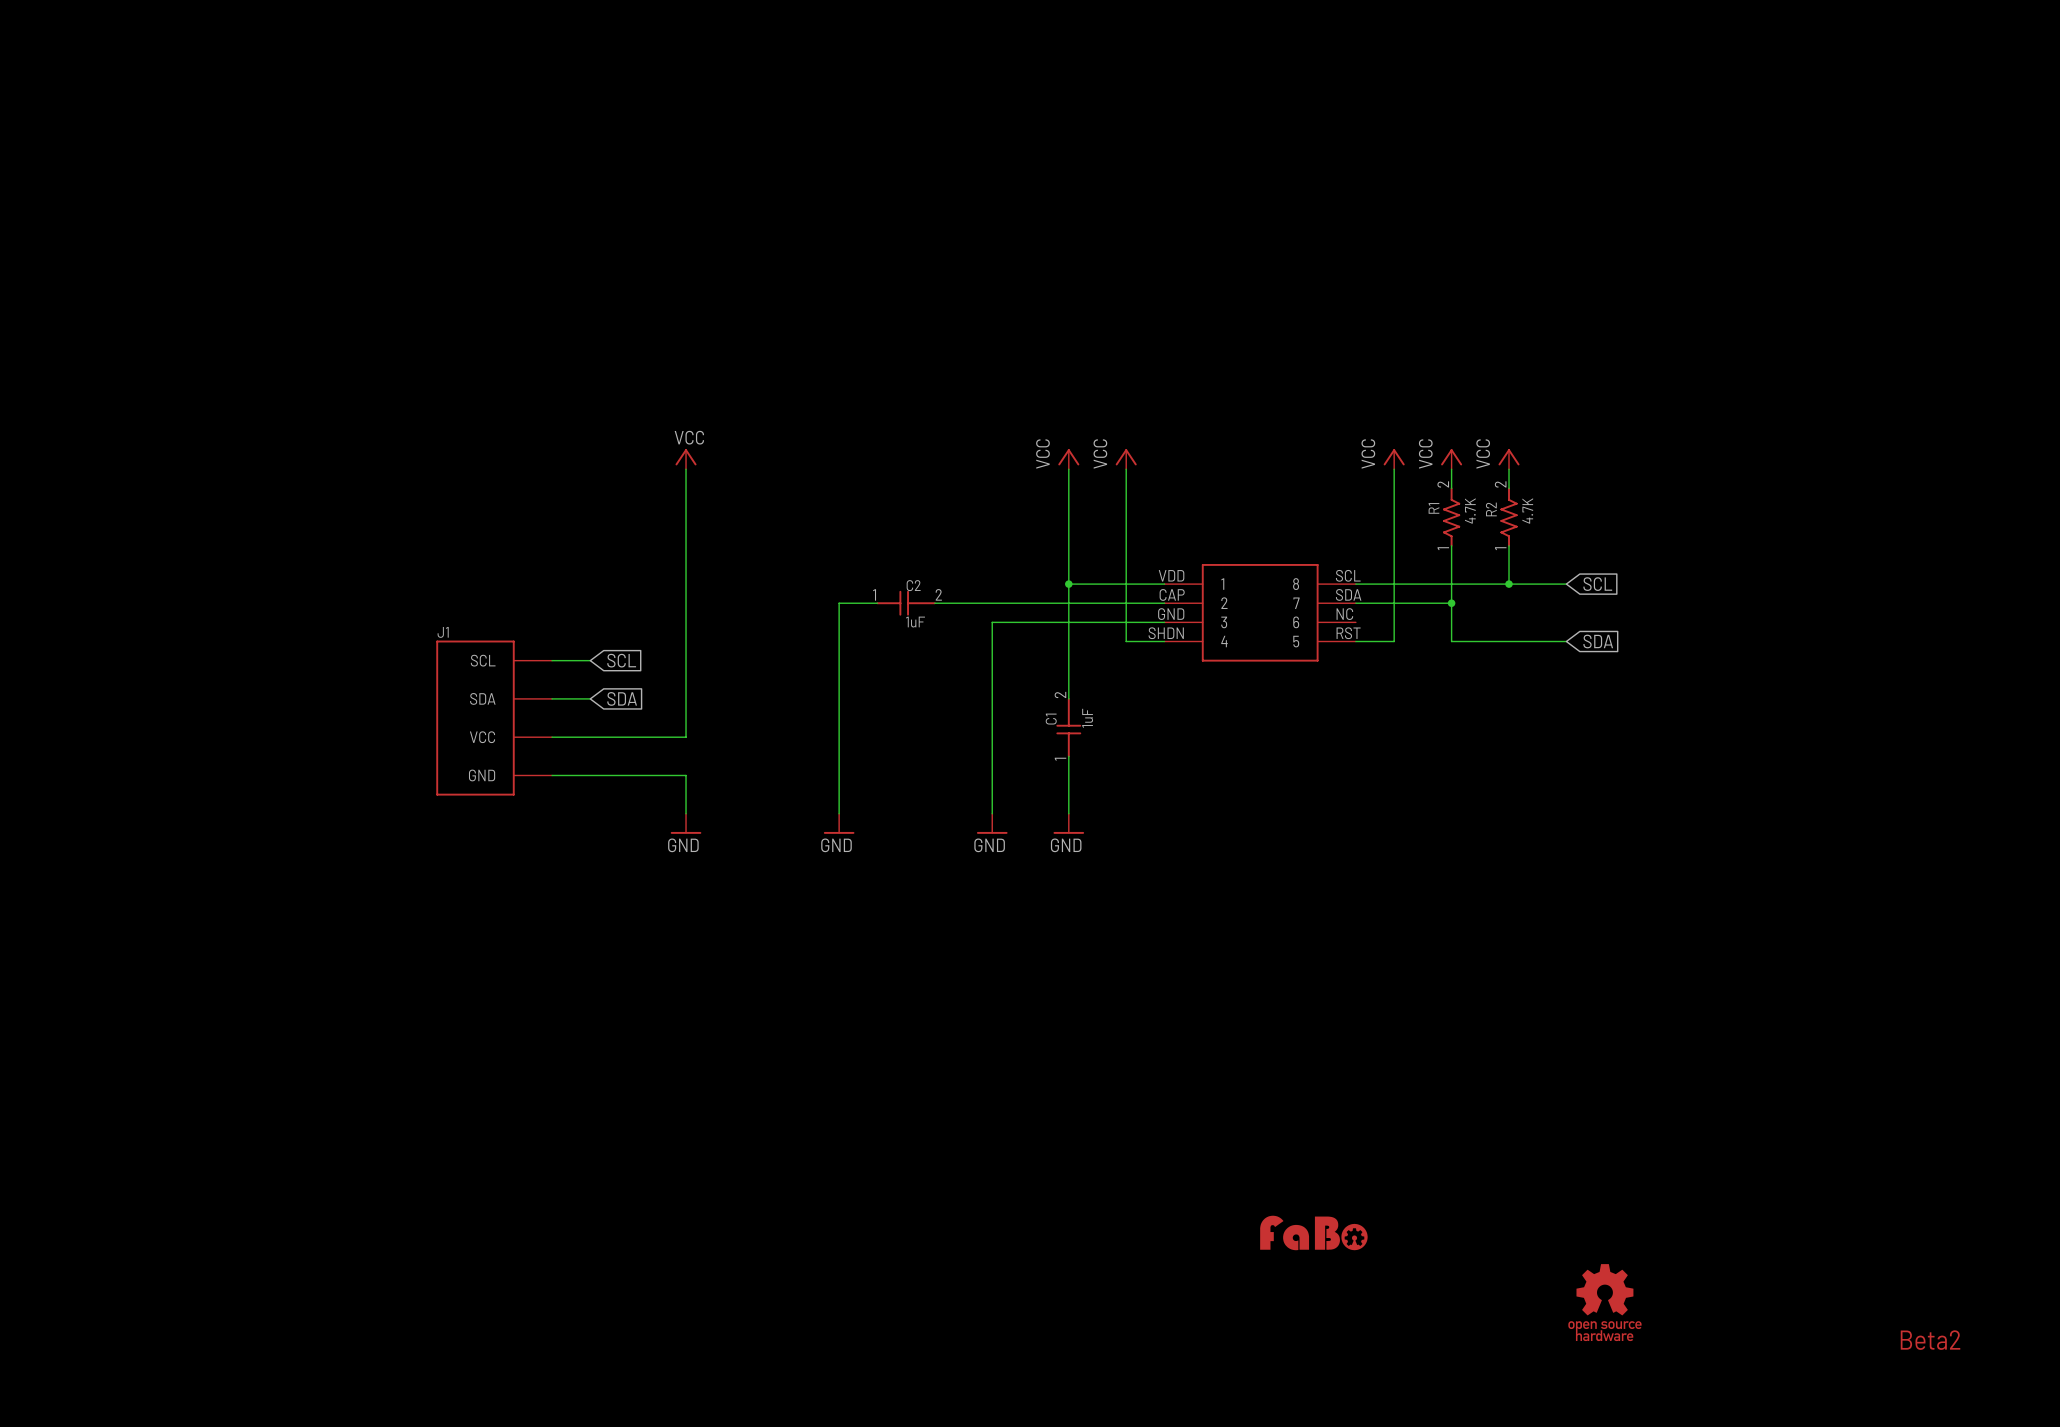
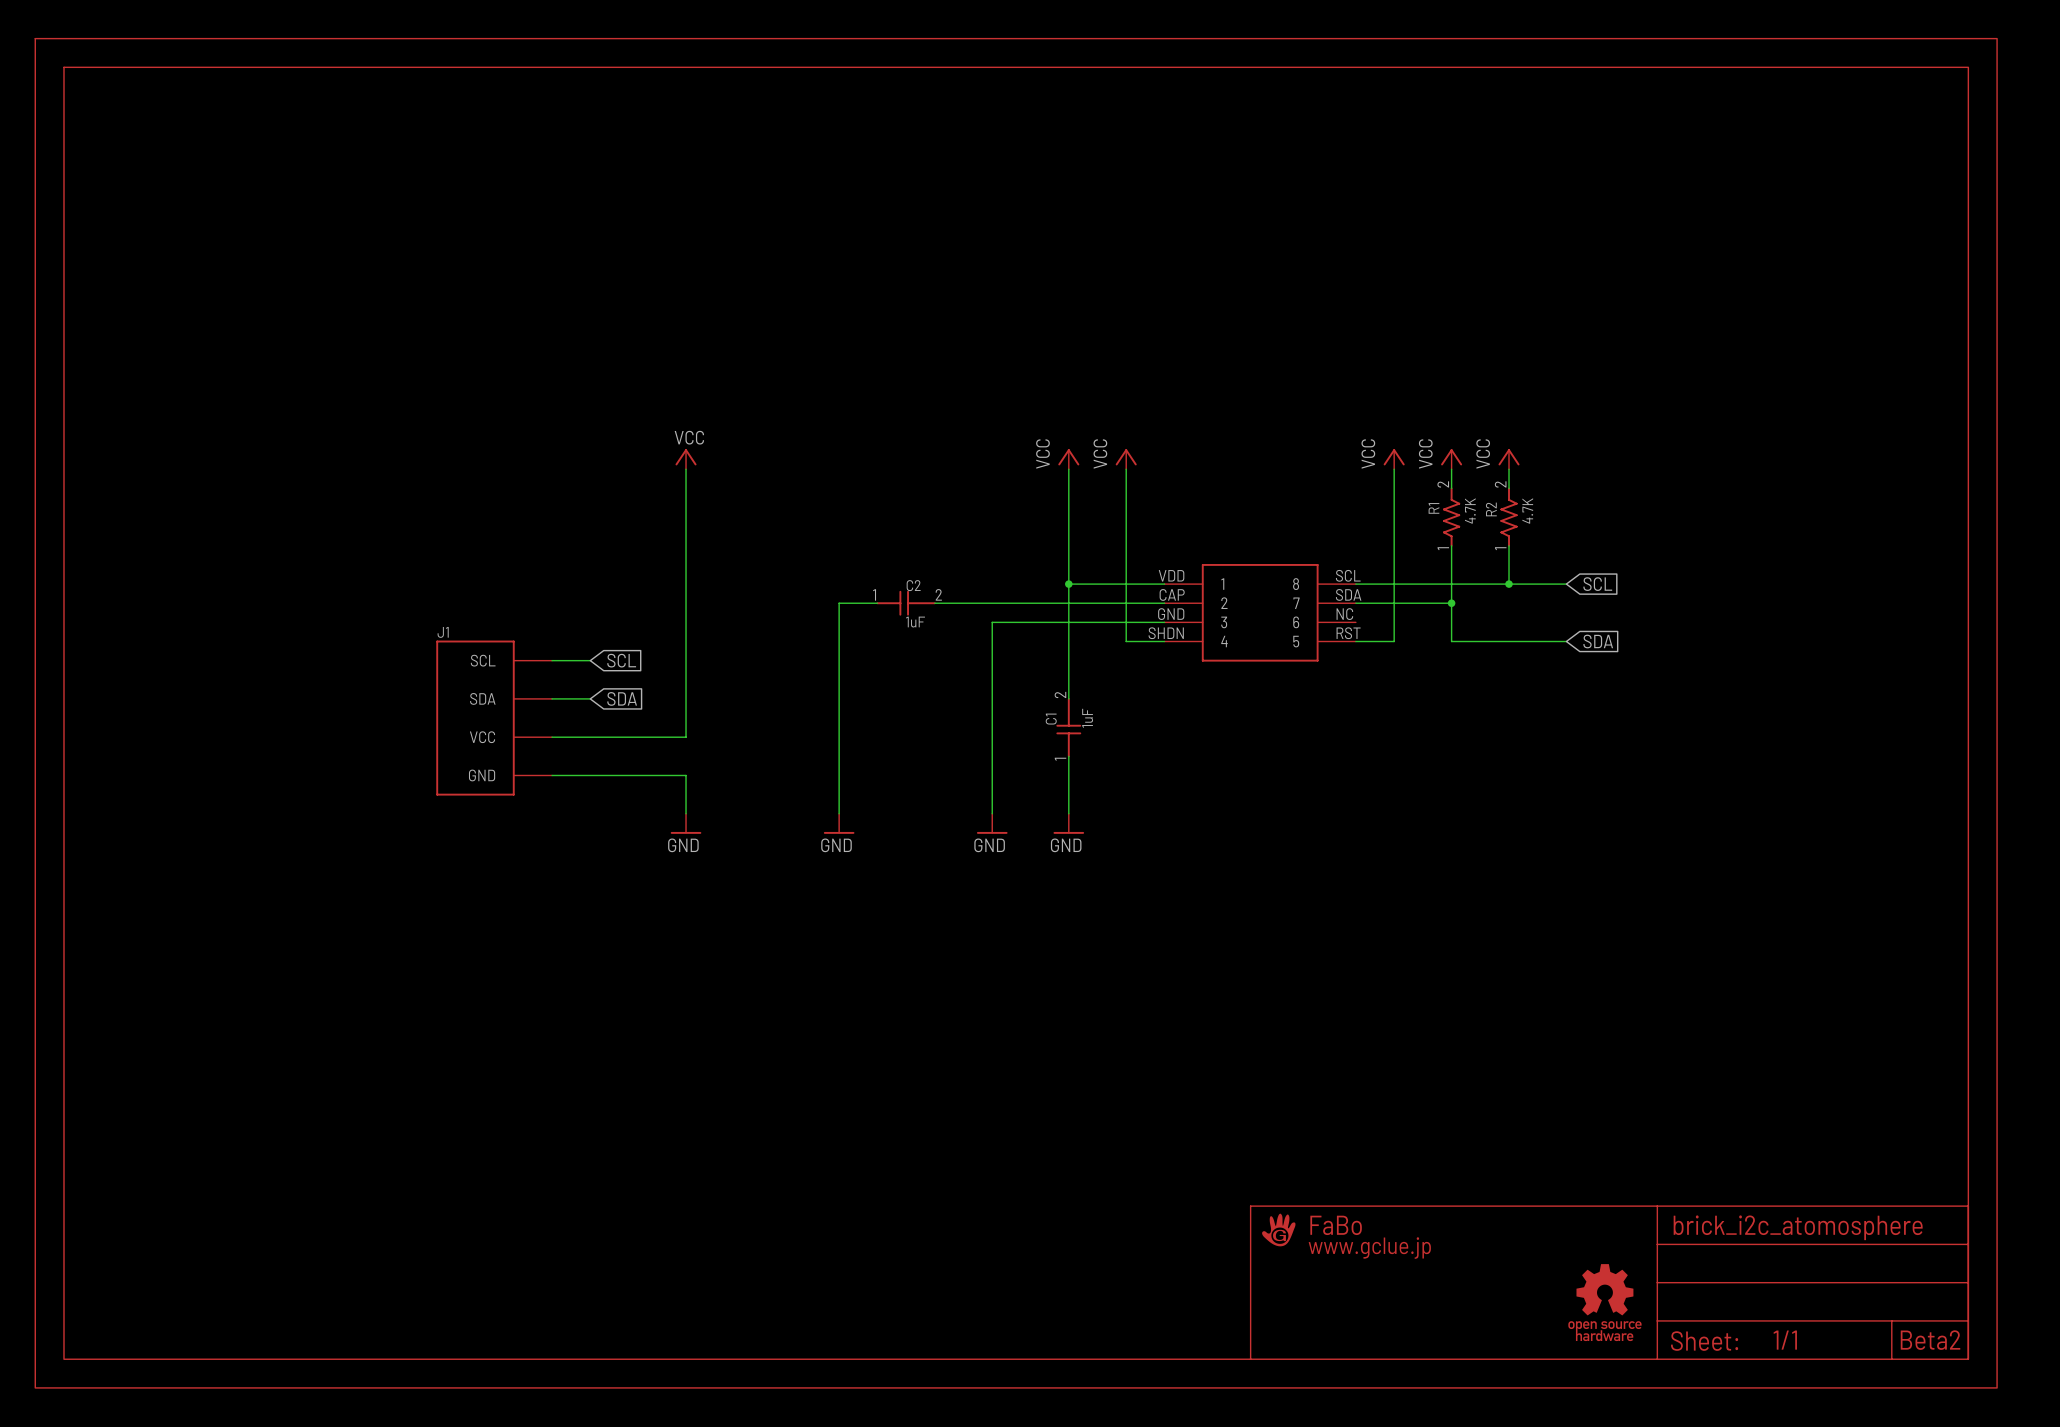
part: none -> (1016, 713)
part: (1313, 1232) -> none

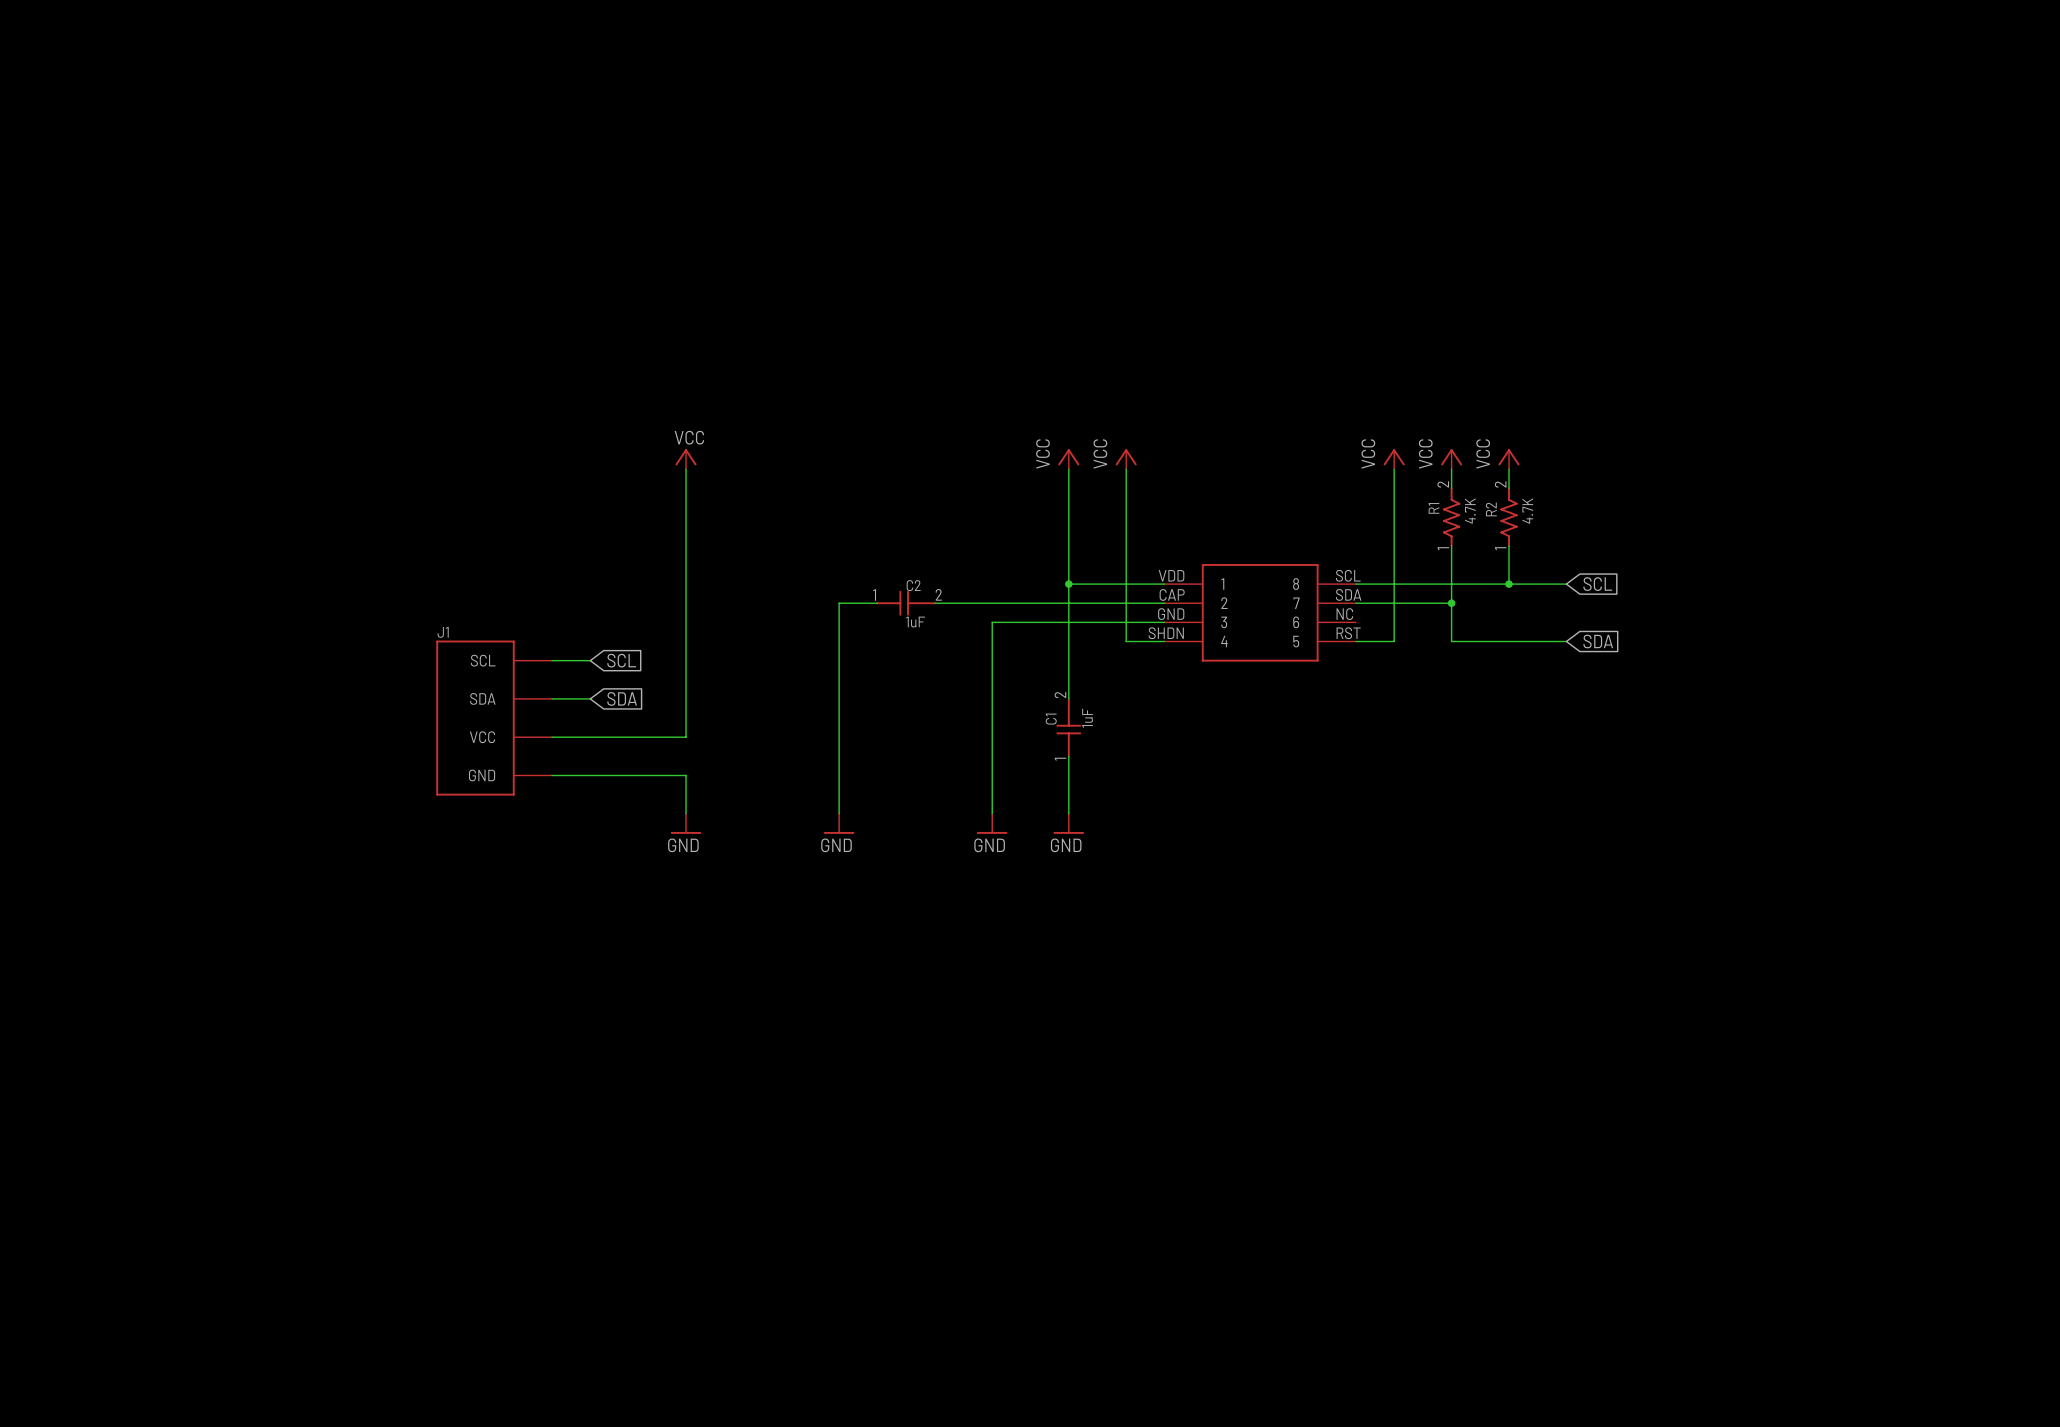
part: (1016, 713) -> none
part: (1604, 1302) -> none
text: Beta2 (1930, 1340) -> none

